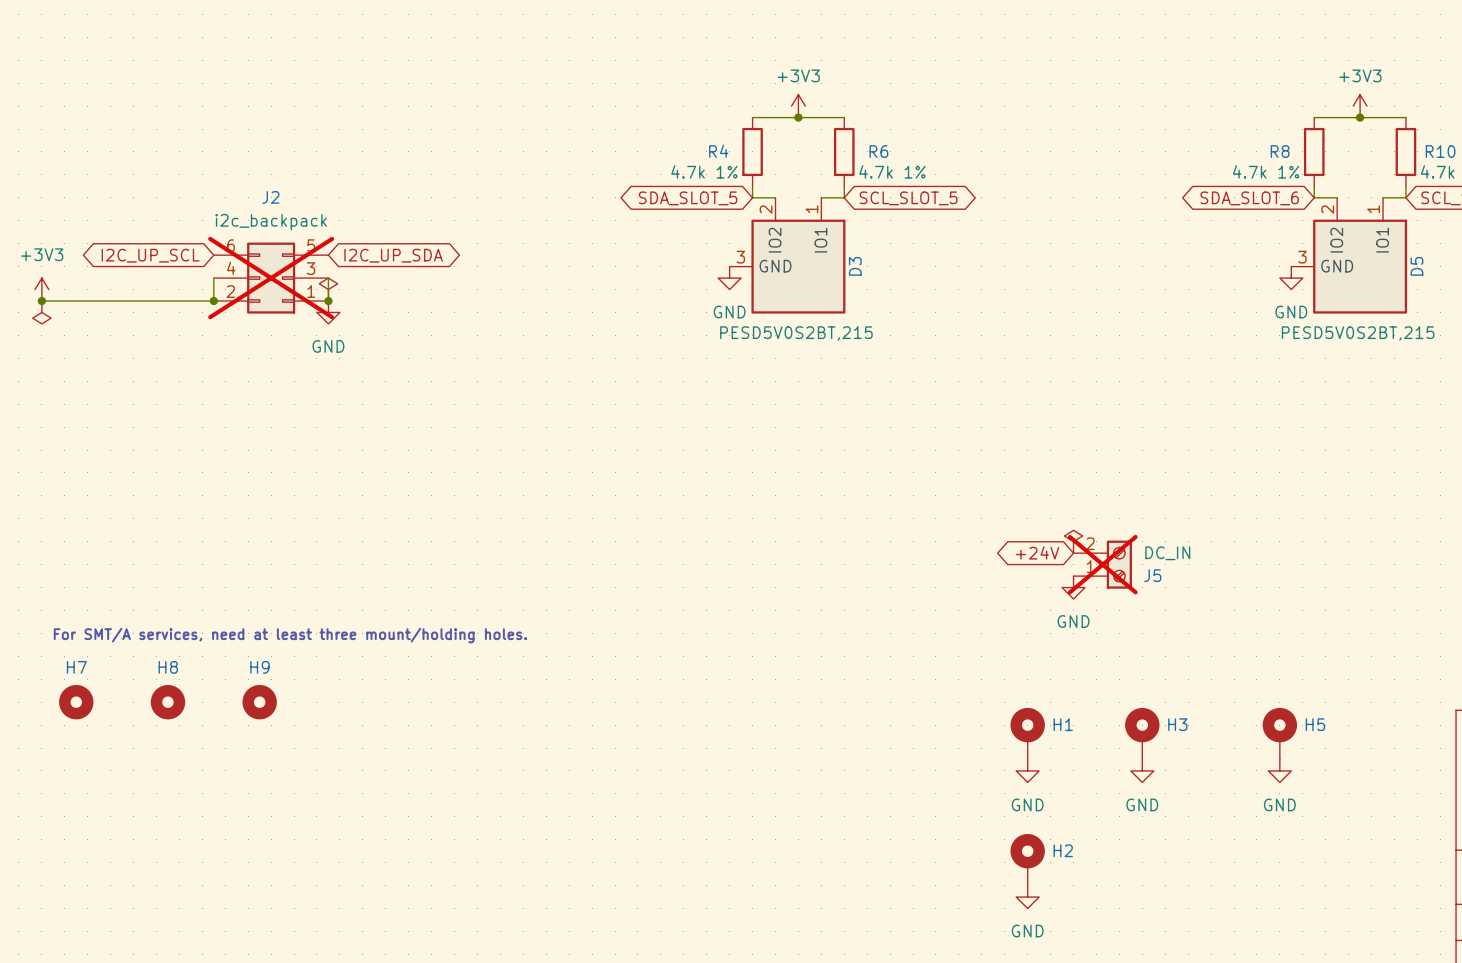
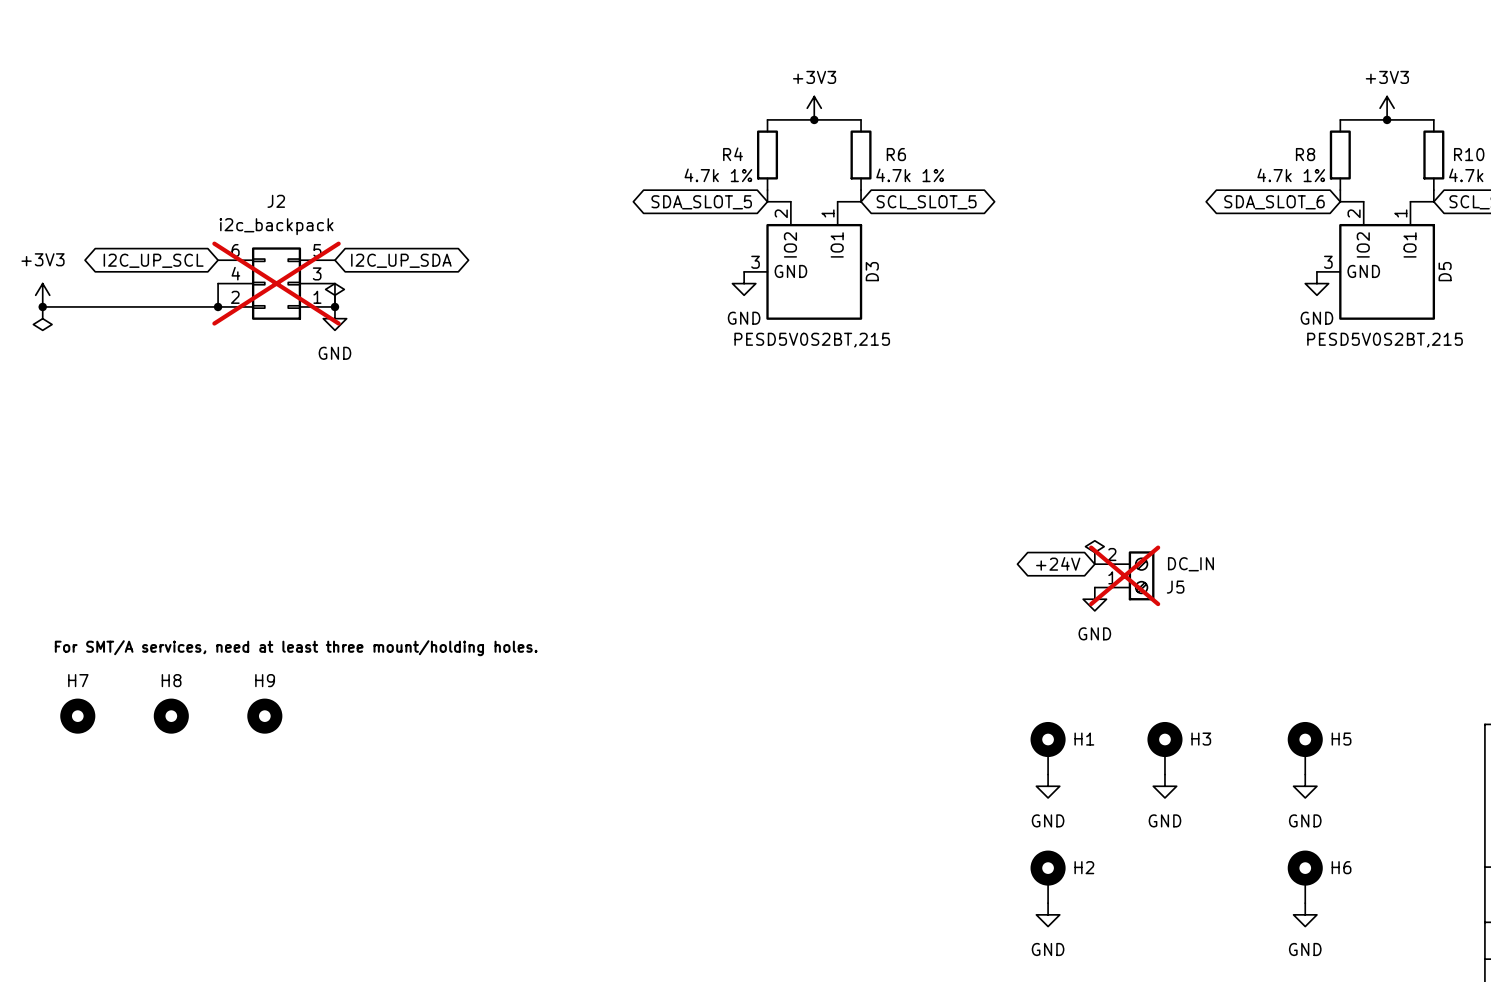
H6: none -> (1305, 876)
power symbol: none -> GND (1305, 914)

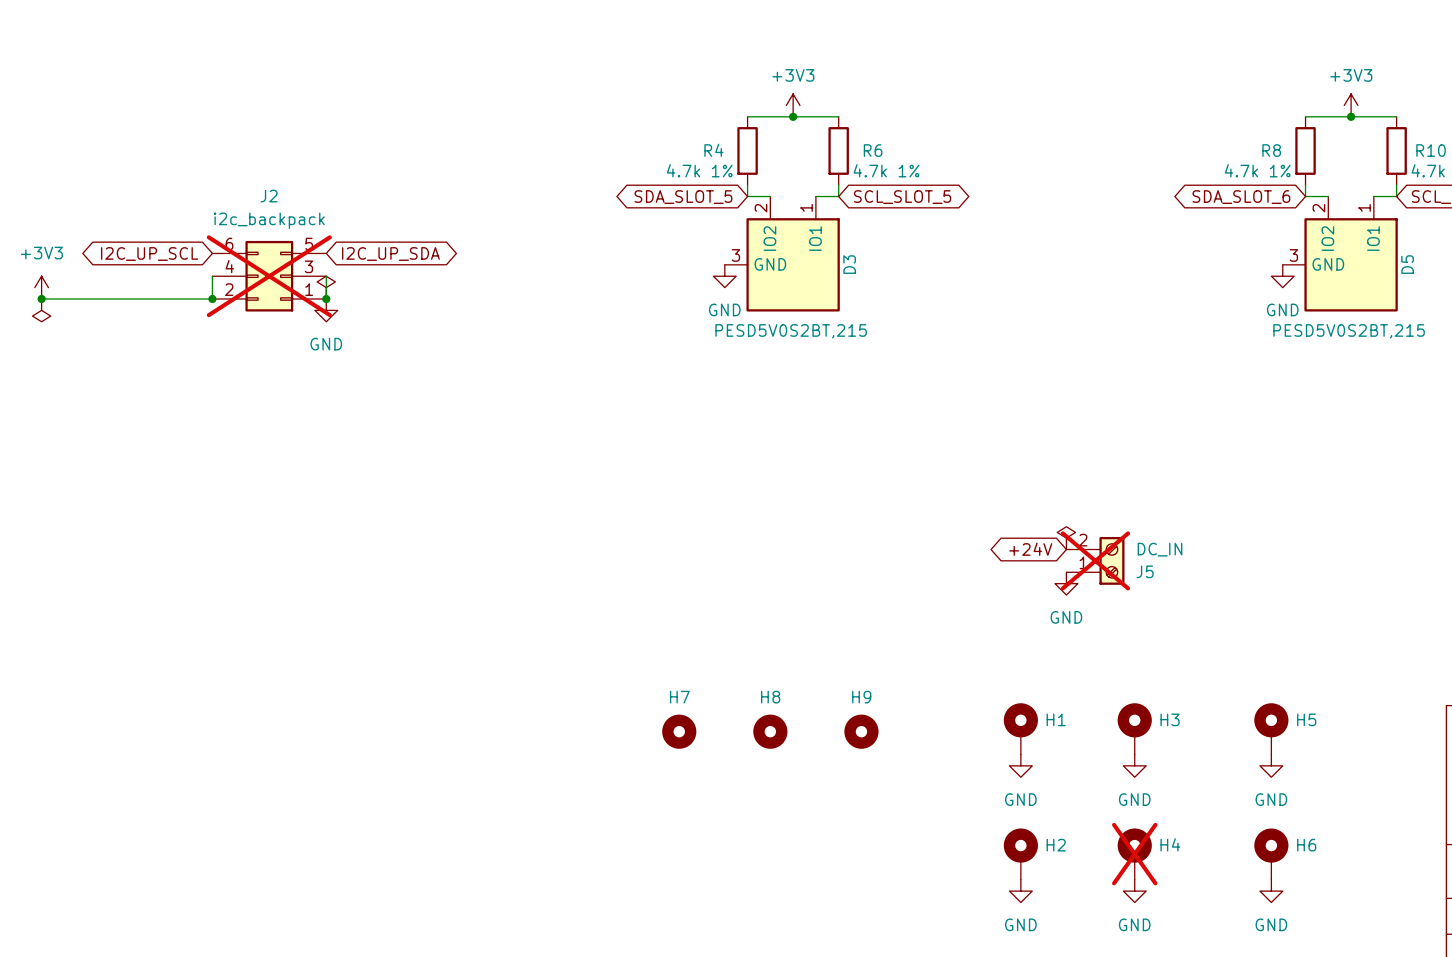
text: For SMT/A services, need at least three mount/holding holes. (296, 648) -> none
H7 position: (77, 716) -> (679, 731)
H8 position: (171, 716) -> (770, 731)
H9 position: (264, 716) -> (861, 731)
H4: none -> (1134, 854)
power symbol: none -> GND (1134, 891)

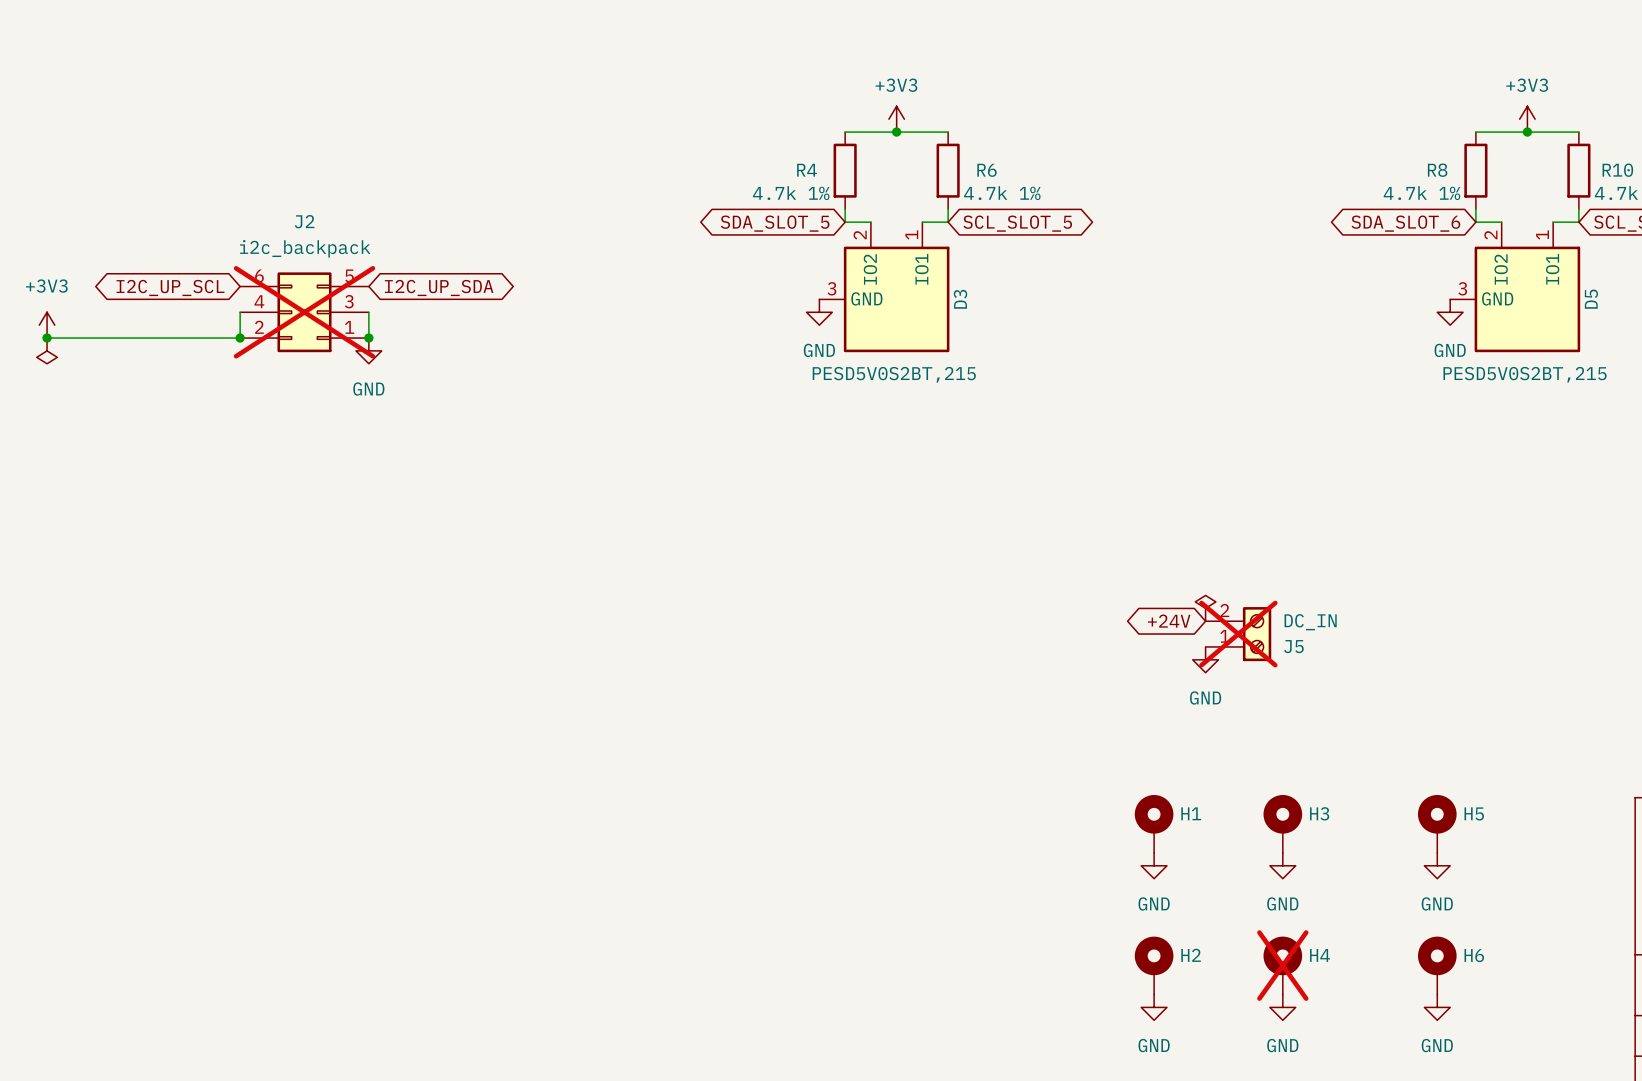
power symbol: (326, 287) -> none
H7: (679, 731) -> none
H8: (770, 731) -> none
H9: (861, 731) -> none

